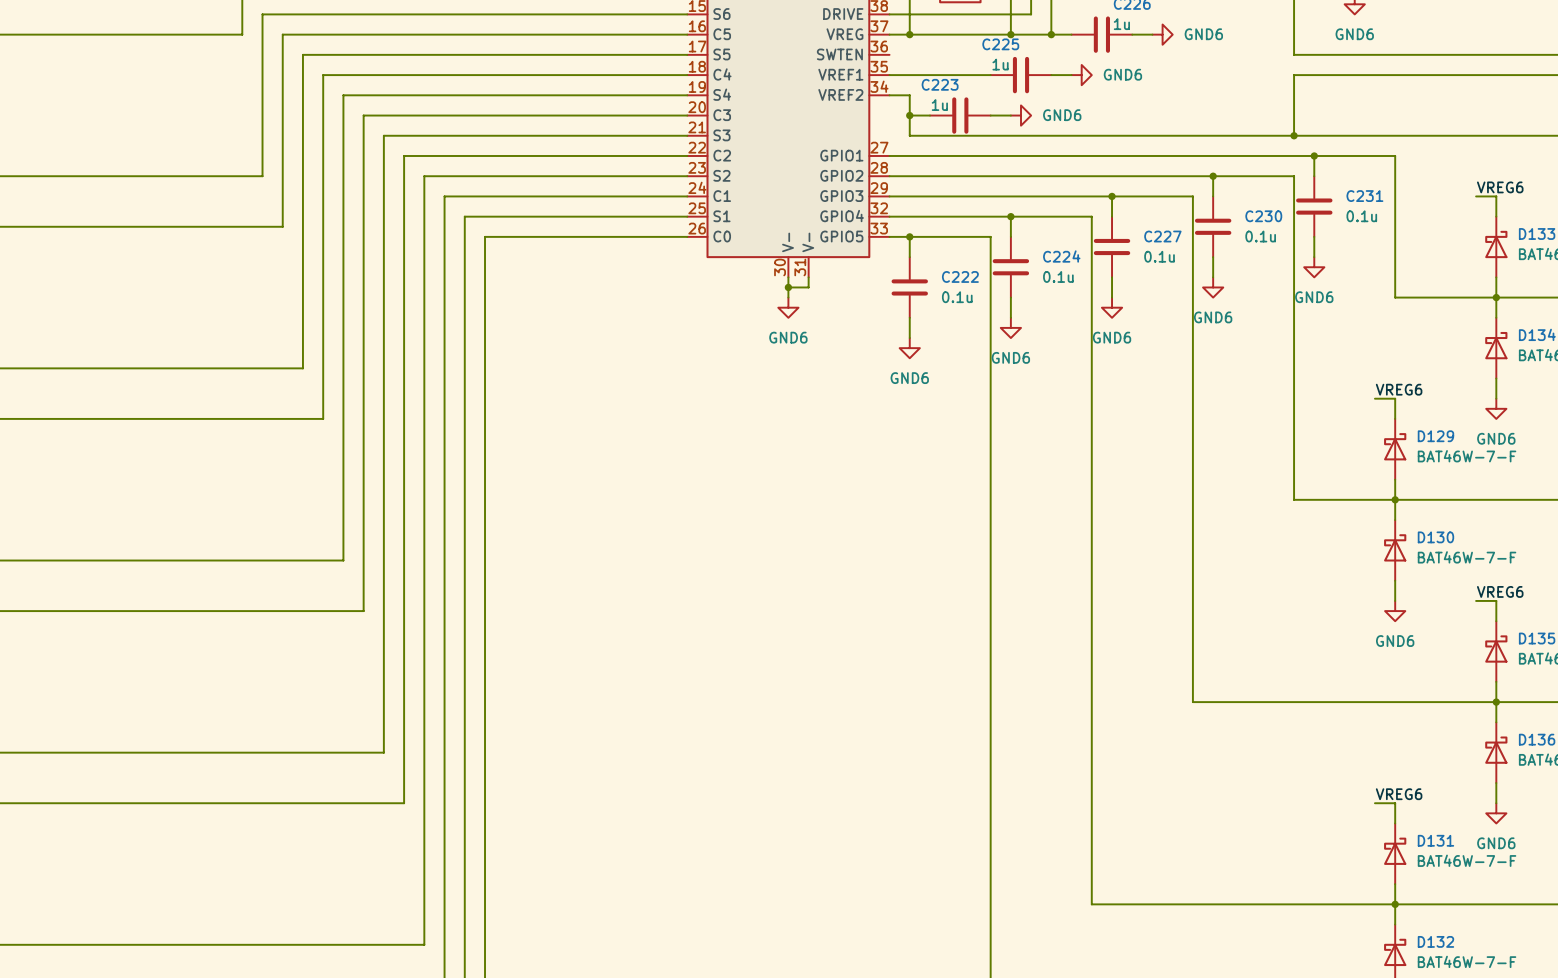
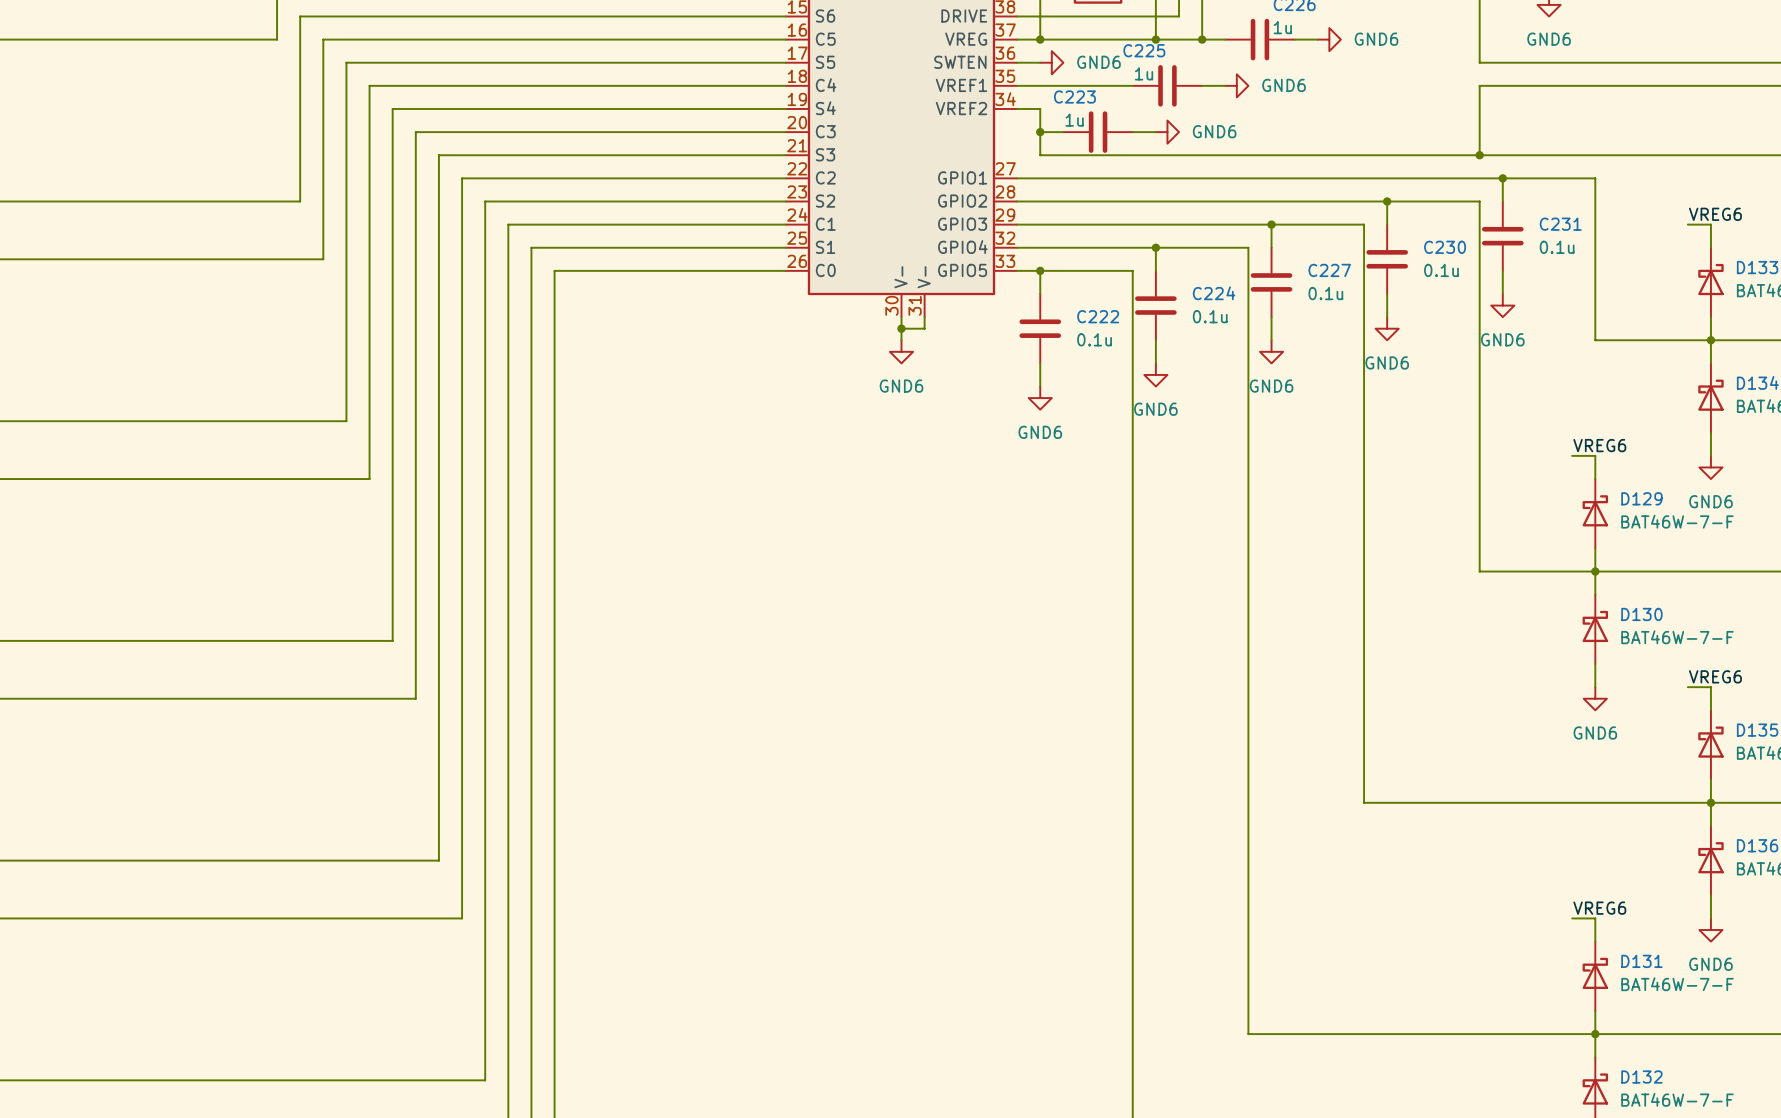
wire: none -> (1017, 62) (1040, 62)
power symbol: none -> GND6 (1051, 62)

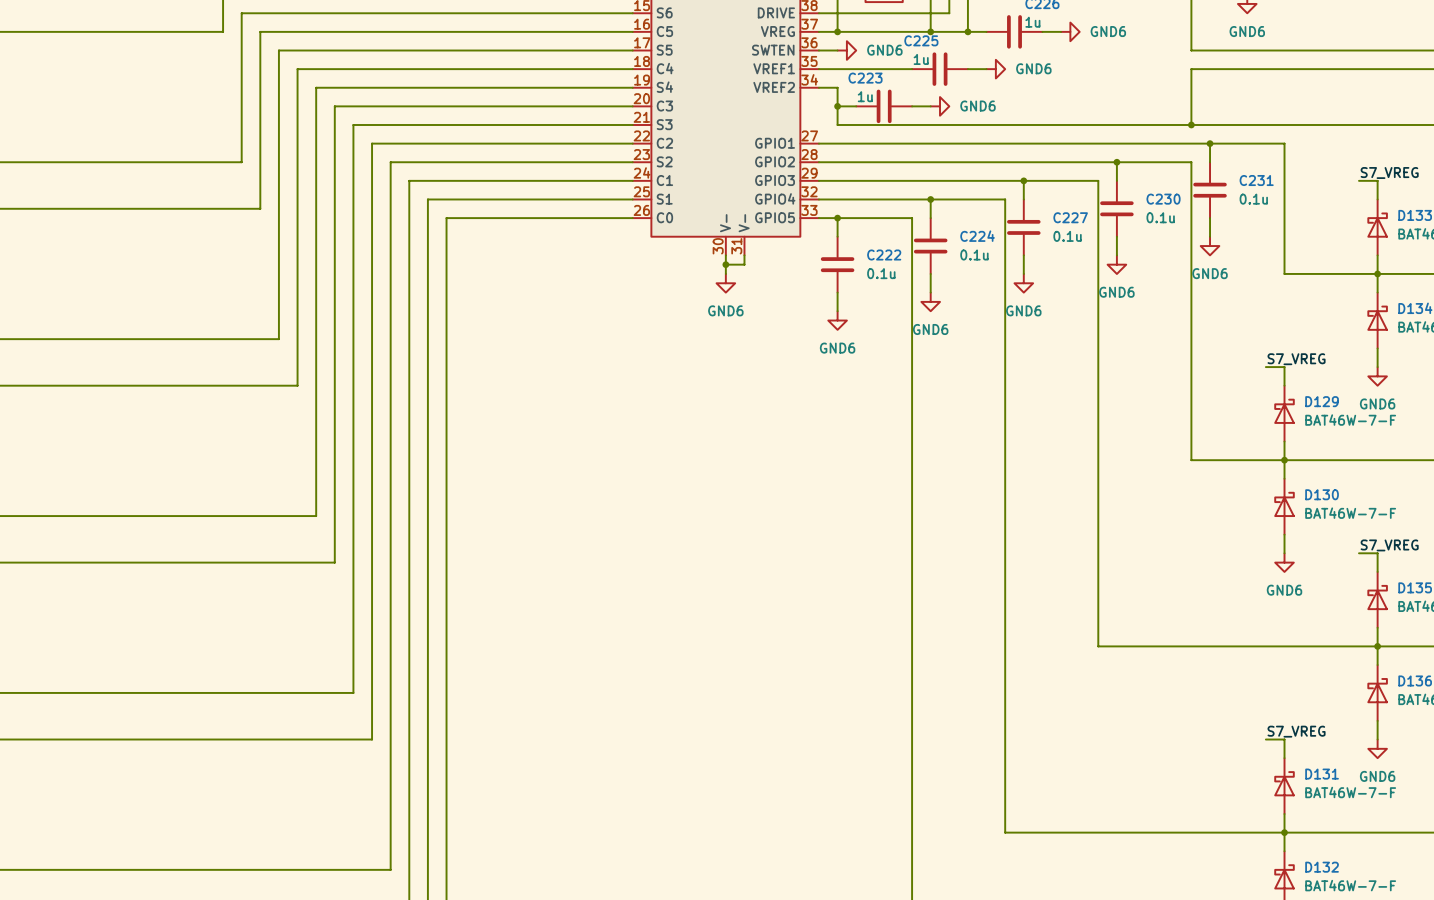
label: VREG6 (1715, 214) -> S7_VREG (1389, 172)
label: VREG6 (1599, 445) -> S7_VREG (1296, 359)
label: VREG6 (1715, 676) -> S7_VREG (1389, 545)
label: VREG6 (1599, 908) -> S7_VREG (1296, 731)

